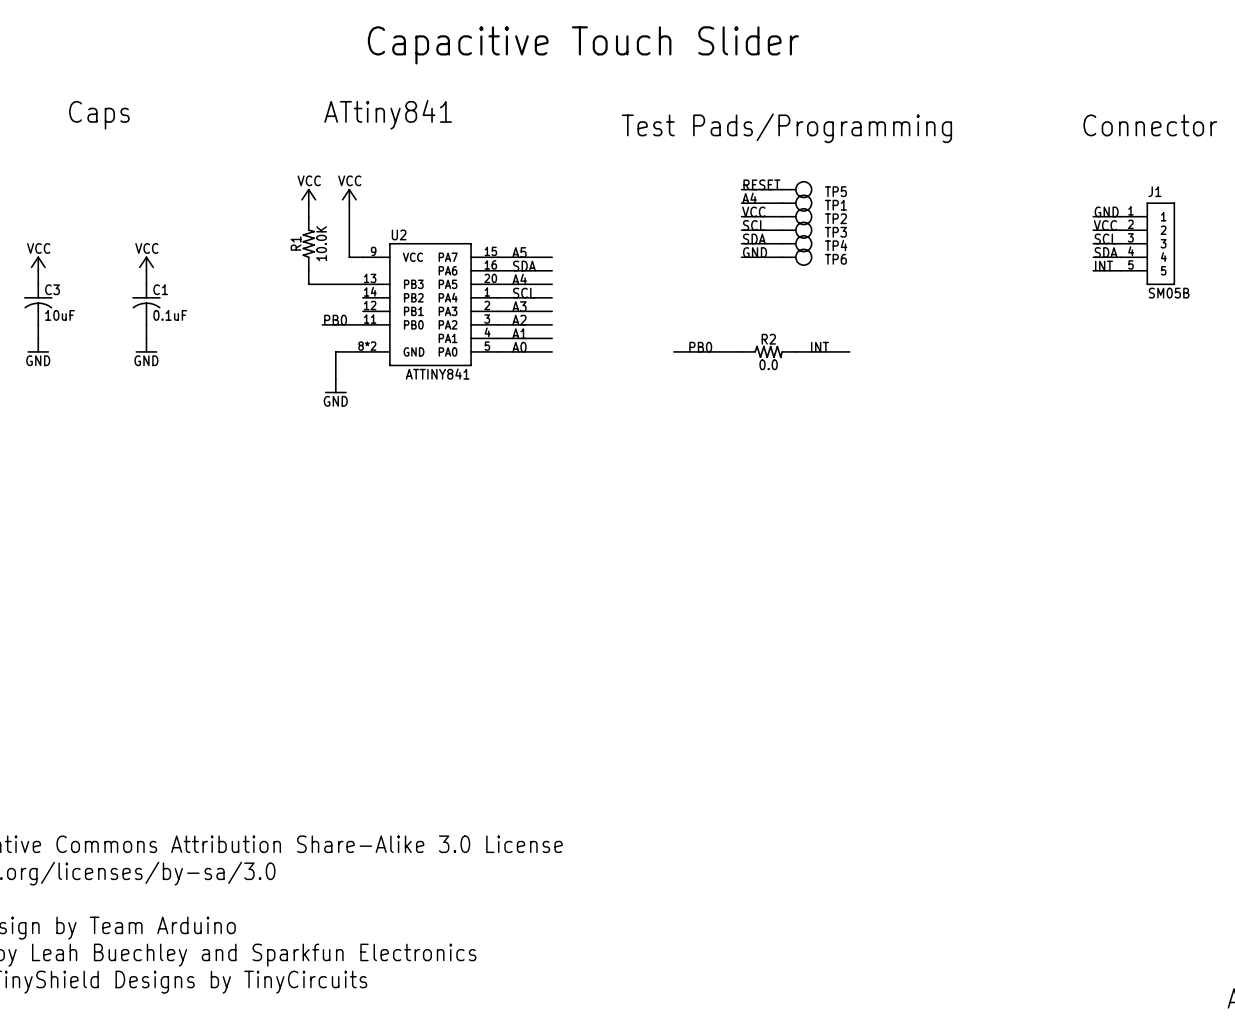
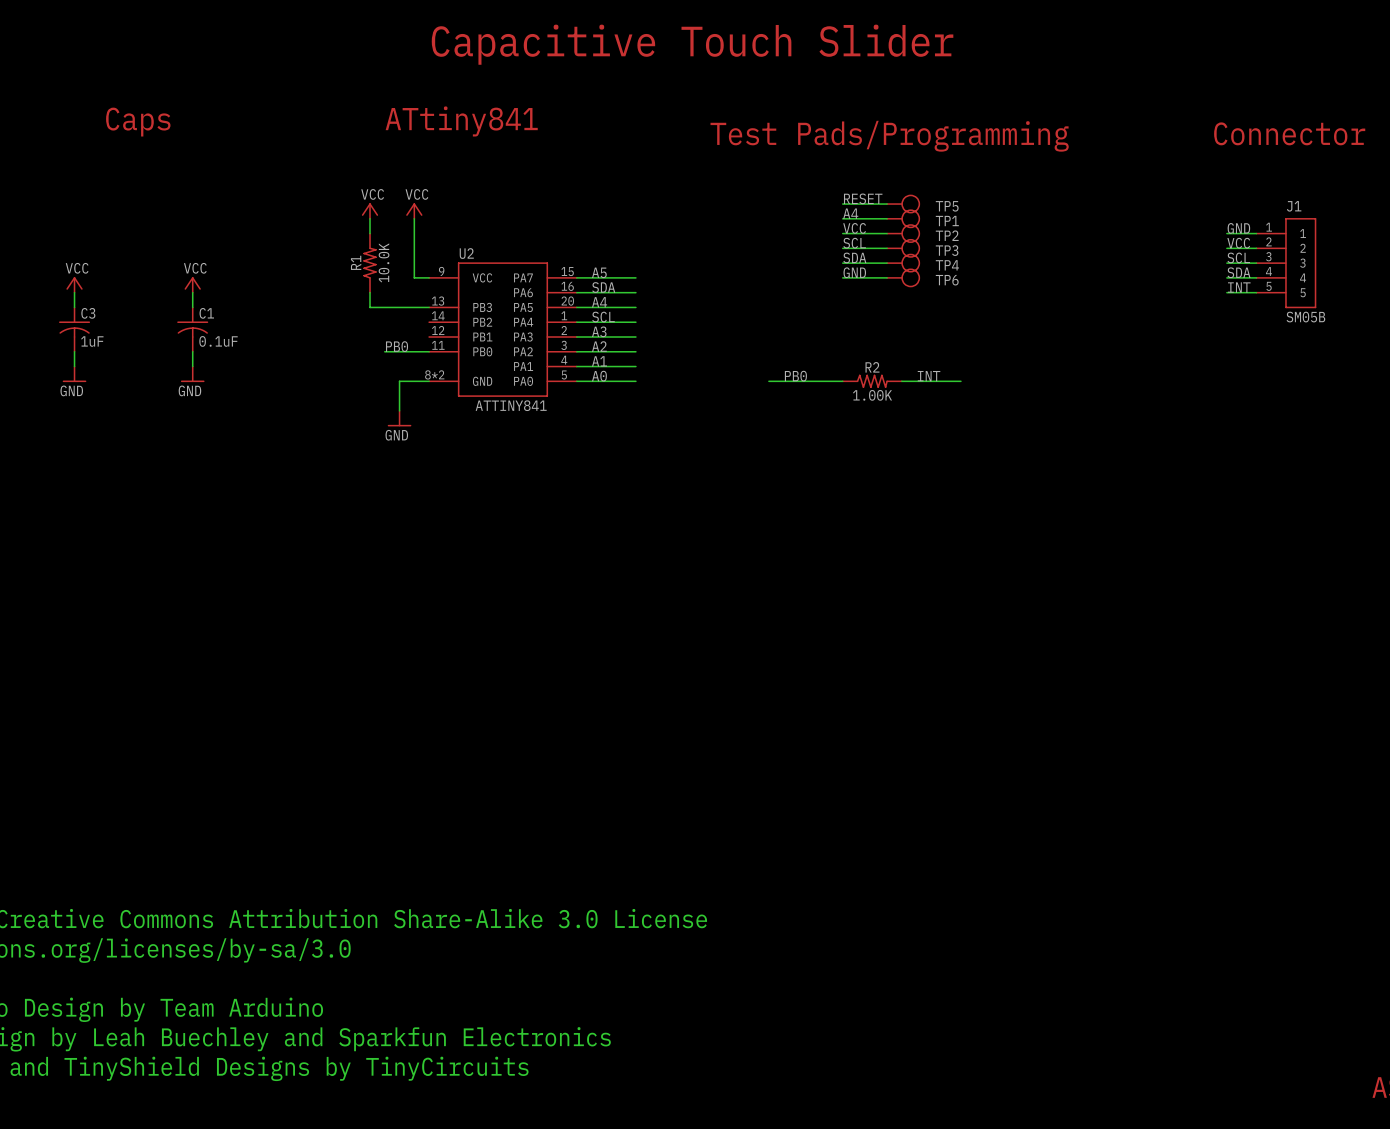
C3 value: 10uF (60, 315) -> 1uF (92, 341)
R2 value: 0.0 (768, 364) -> 1.00K (872, 395)

